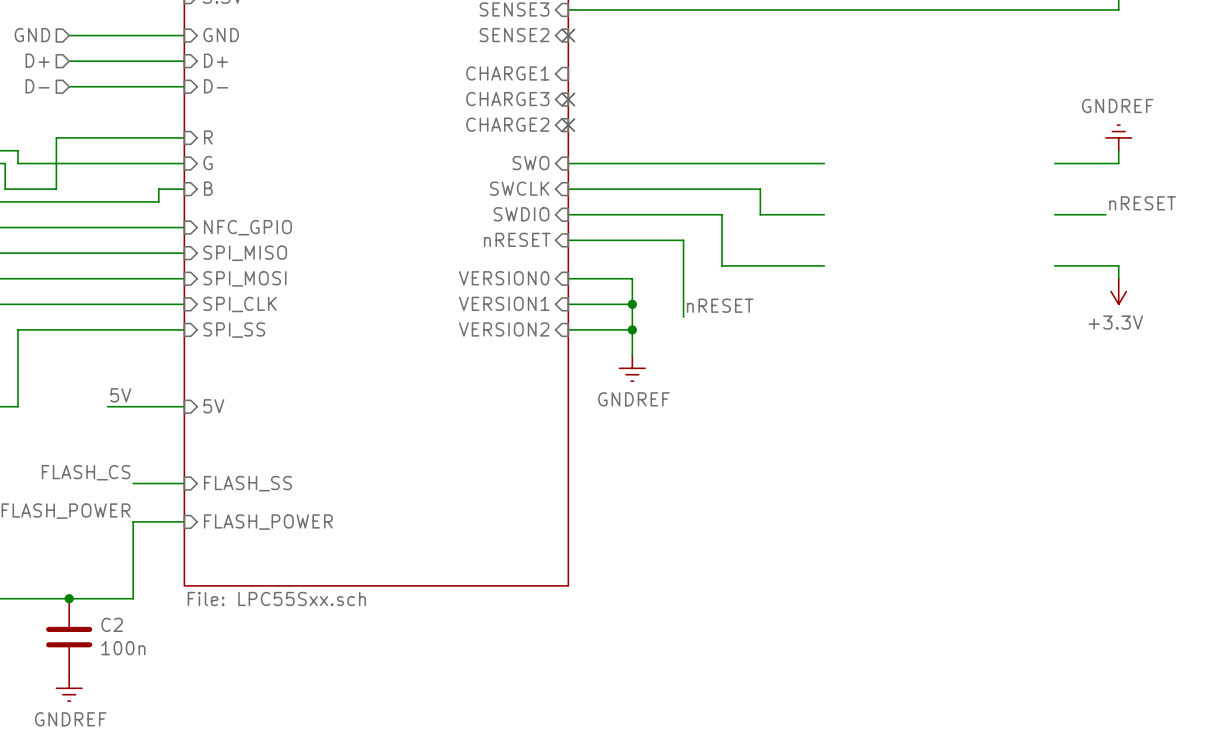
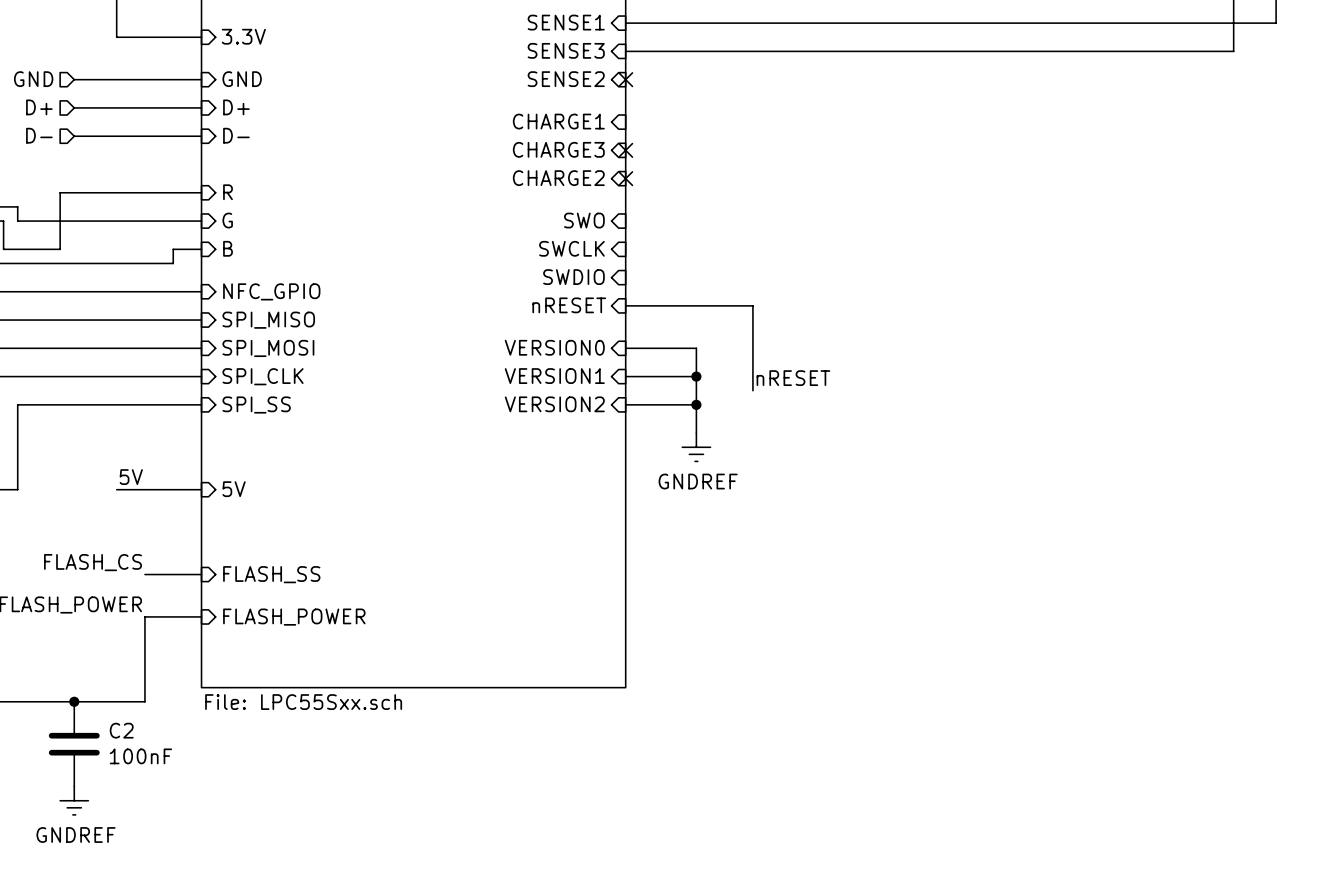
power symbol: GNDREF (1118, 137) -> none
wire: (1118, 150) (1118, 163) (1054, 163) -> none
wire: (568, 163) (824, 163) -> none
wire: (568, 189) (760, 189) (760, 214) (824, 214) -> none
label: nRESET (1142, 203) -> none
wire: (568, 214) (721, 214) (721, 265) (824, 265) -> none
wire: (1054, 214) (1105, 214) -> none
wire: (1054, 265) (1118, 265) (1118, 278) -> none
power symbol: +3.3V (1118, 291) -> none
C2 value: 100n (123, 648) -> 100nF (140, 756)

